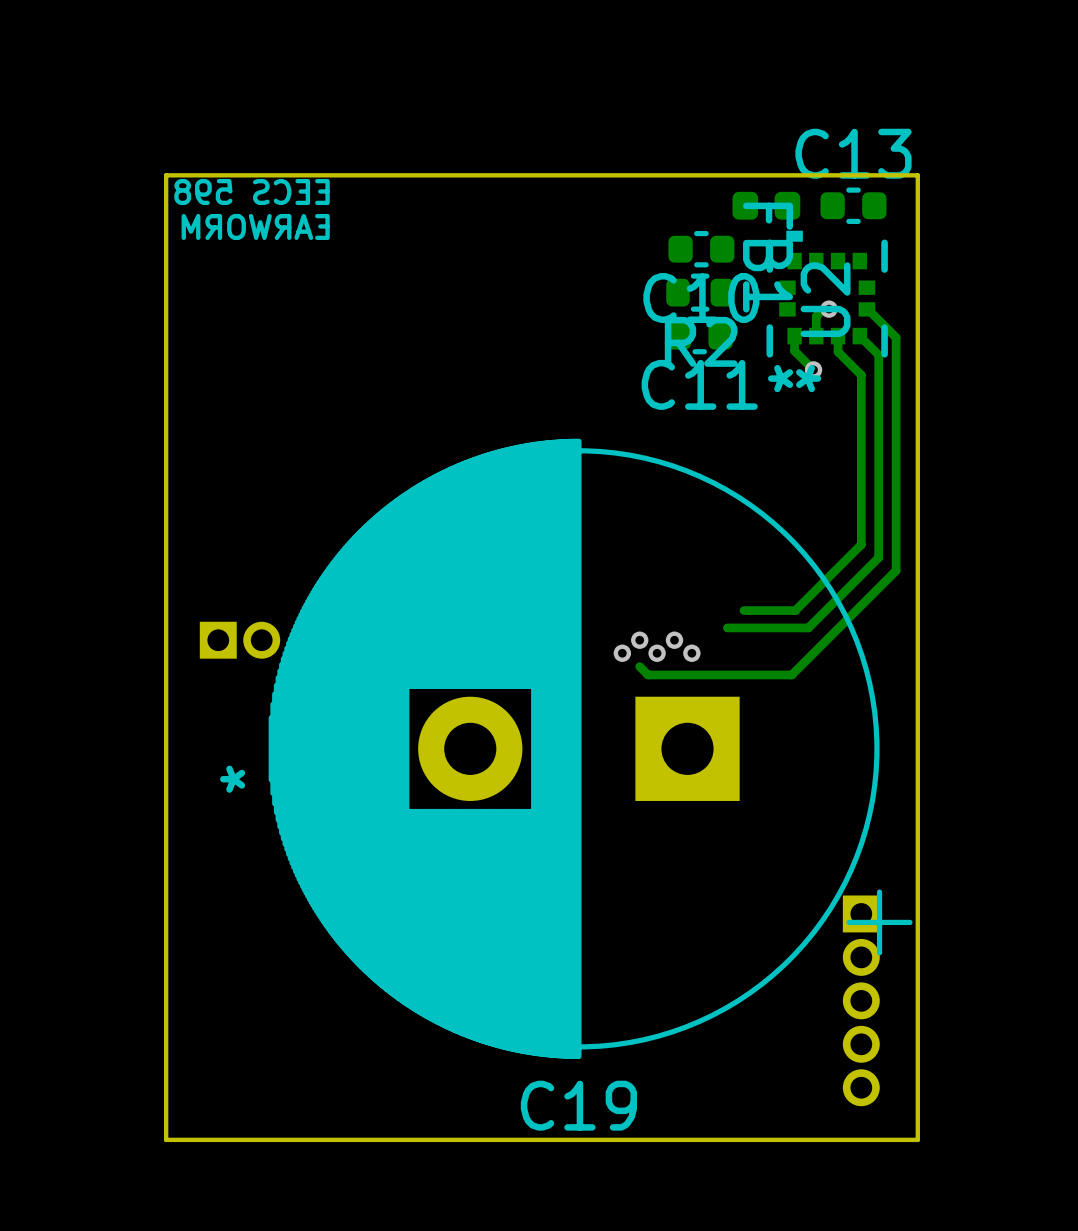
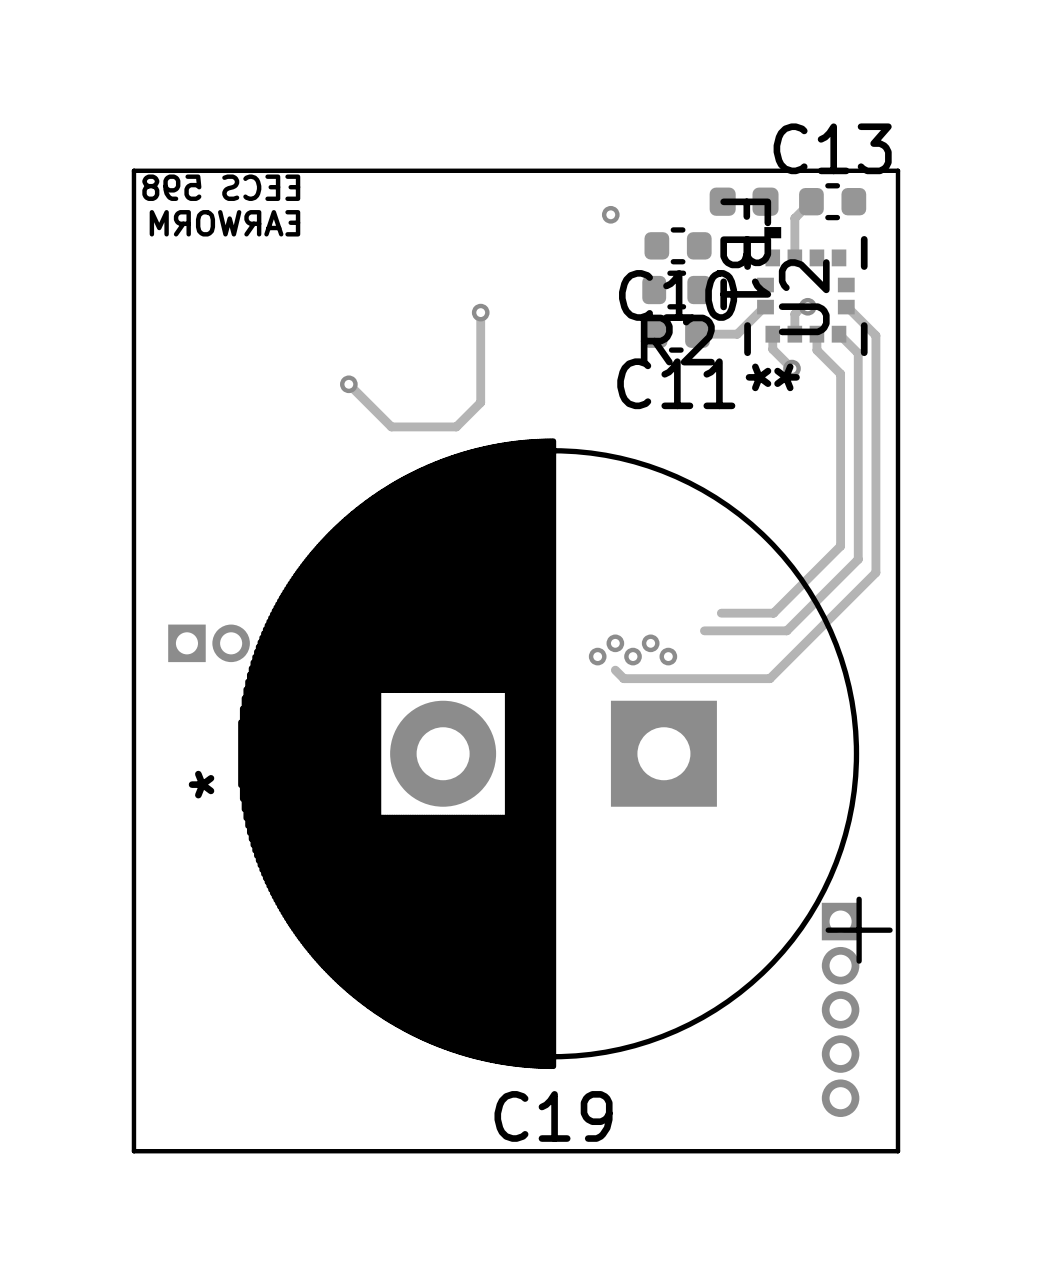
track: none -> (811, 201) (794, 218) (794, 257)
via: none -> (610, 214)
track: none -> (765, 307) (737, 334) (697, 334)
track: none -> (480, 312) (480, 402) (456, 426) (391, 426) (348, 384)
via: none -> (480, 312)
via: none -> (348, 384)

